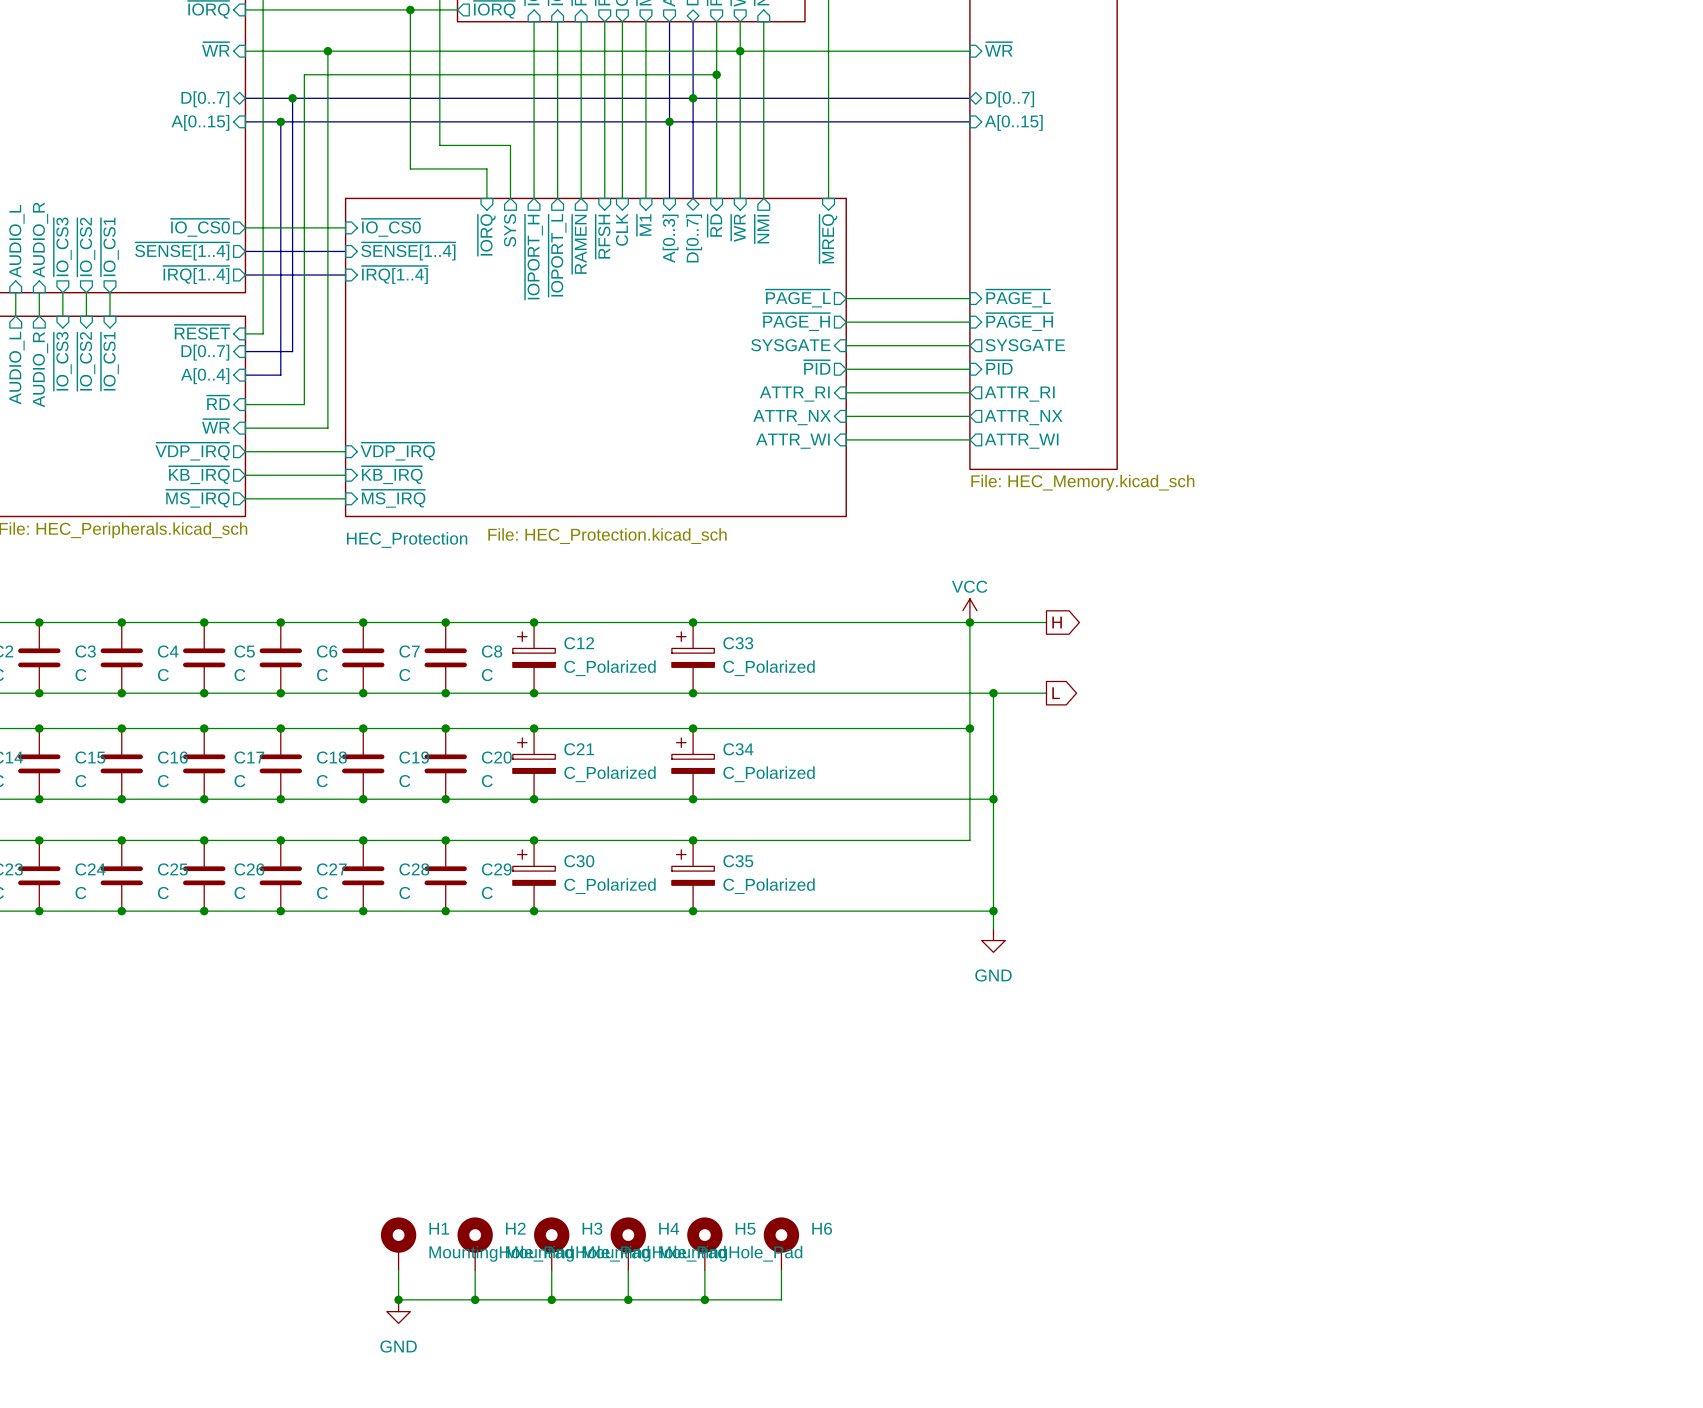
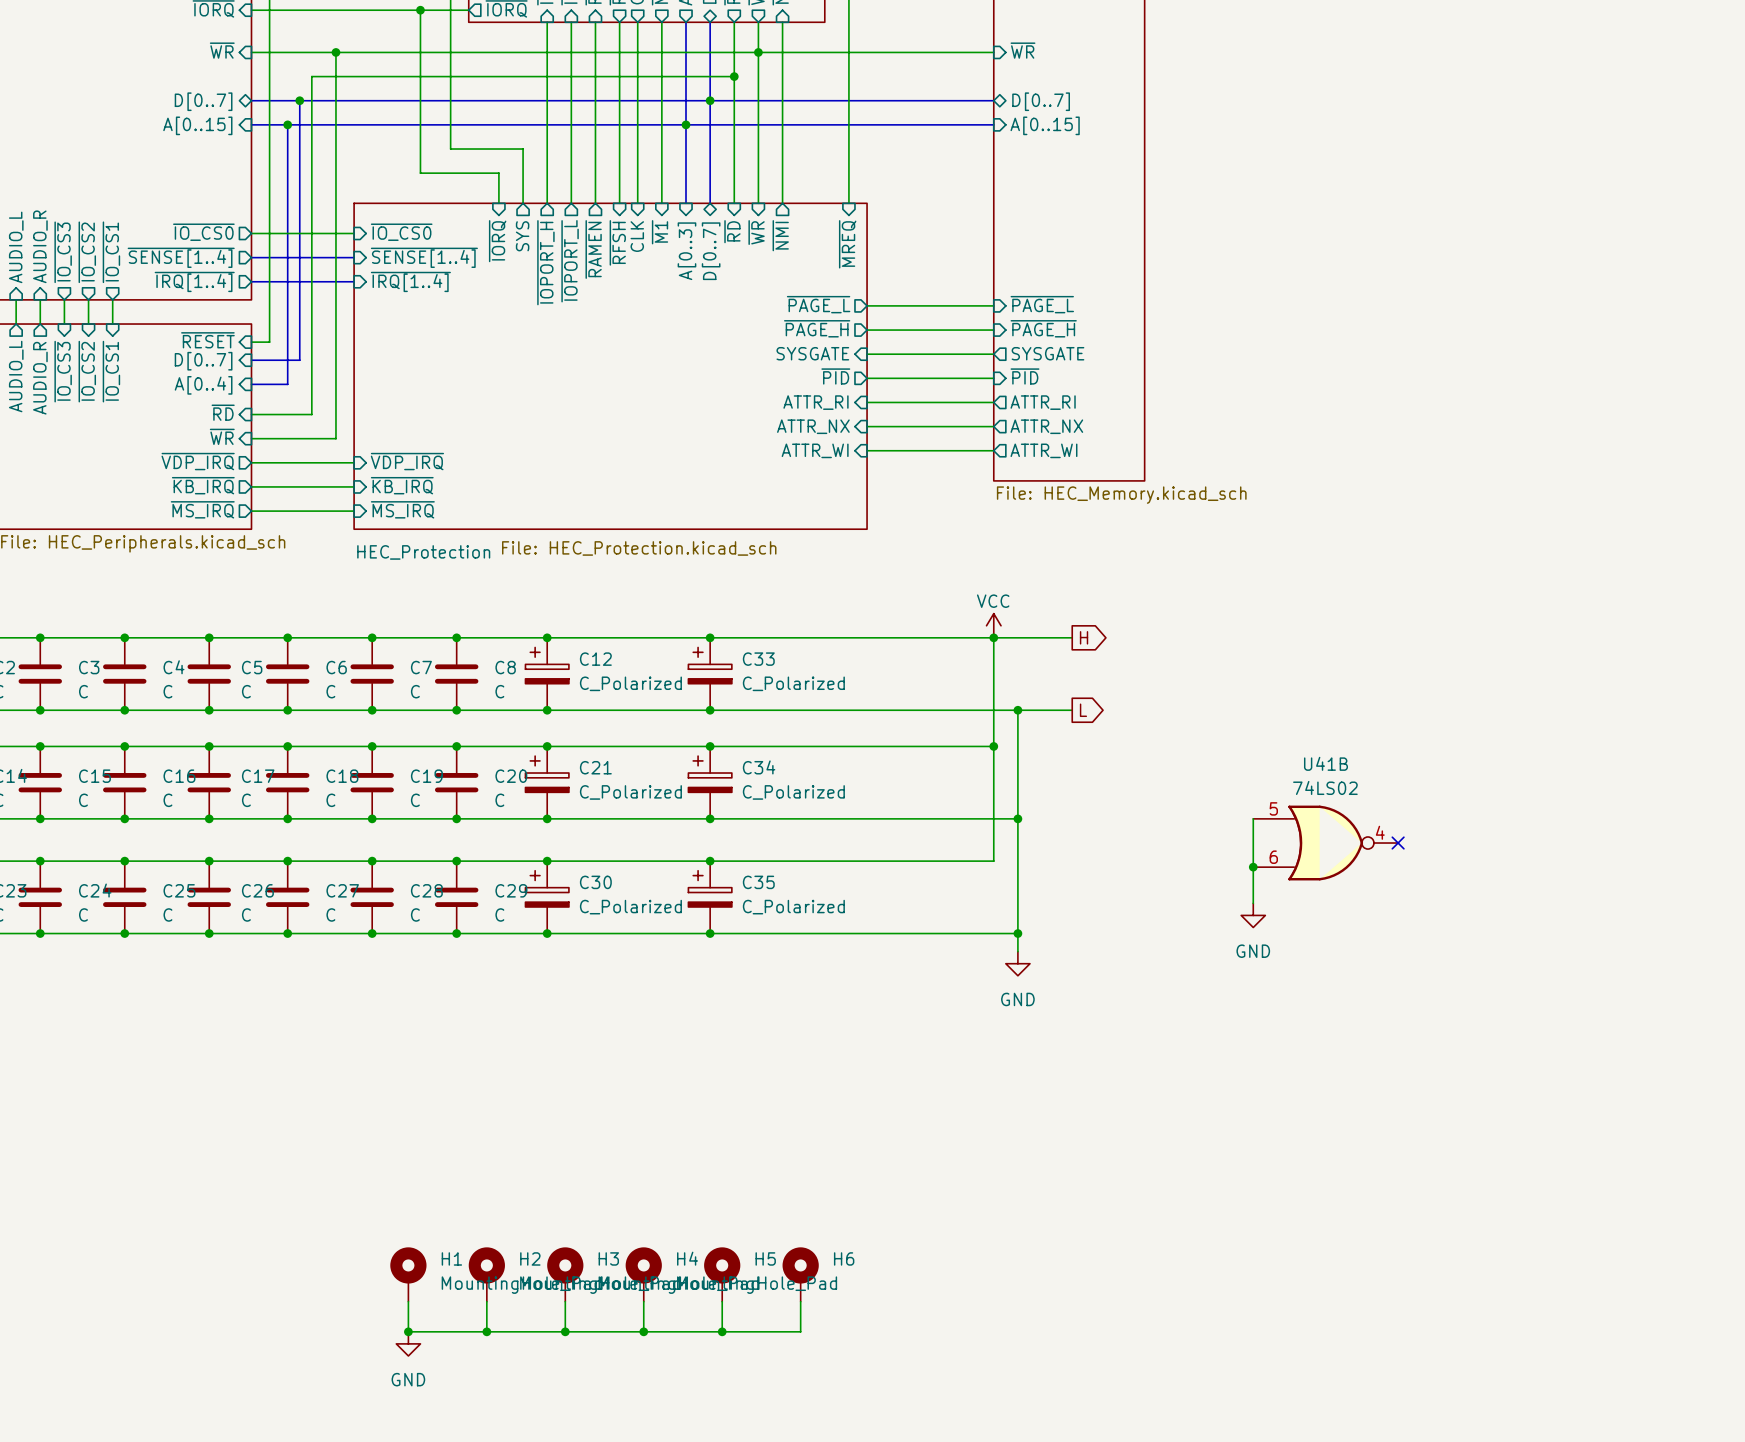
wire: none -> (1253, 818) (1253, 903)
U41B: none -> 74LS02 (1325, 843)
no-connect mark: none -> (1398, 843)
junction: none -> (1253, 867)
power symbol: none -> GND (1253, 915)

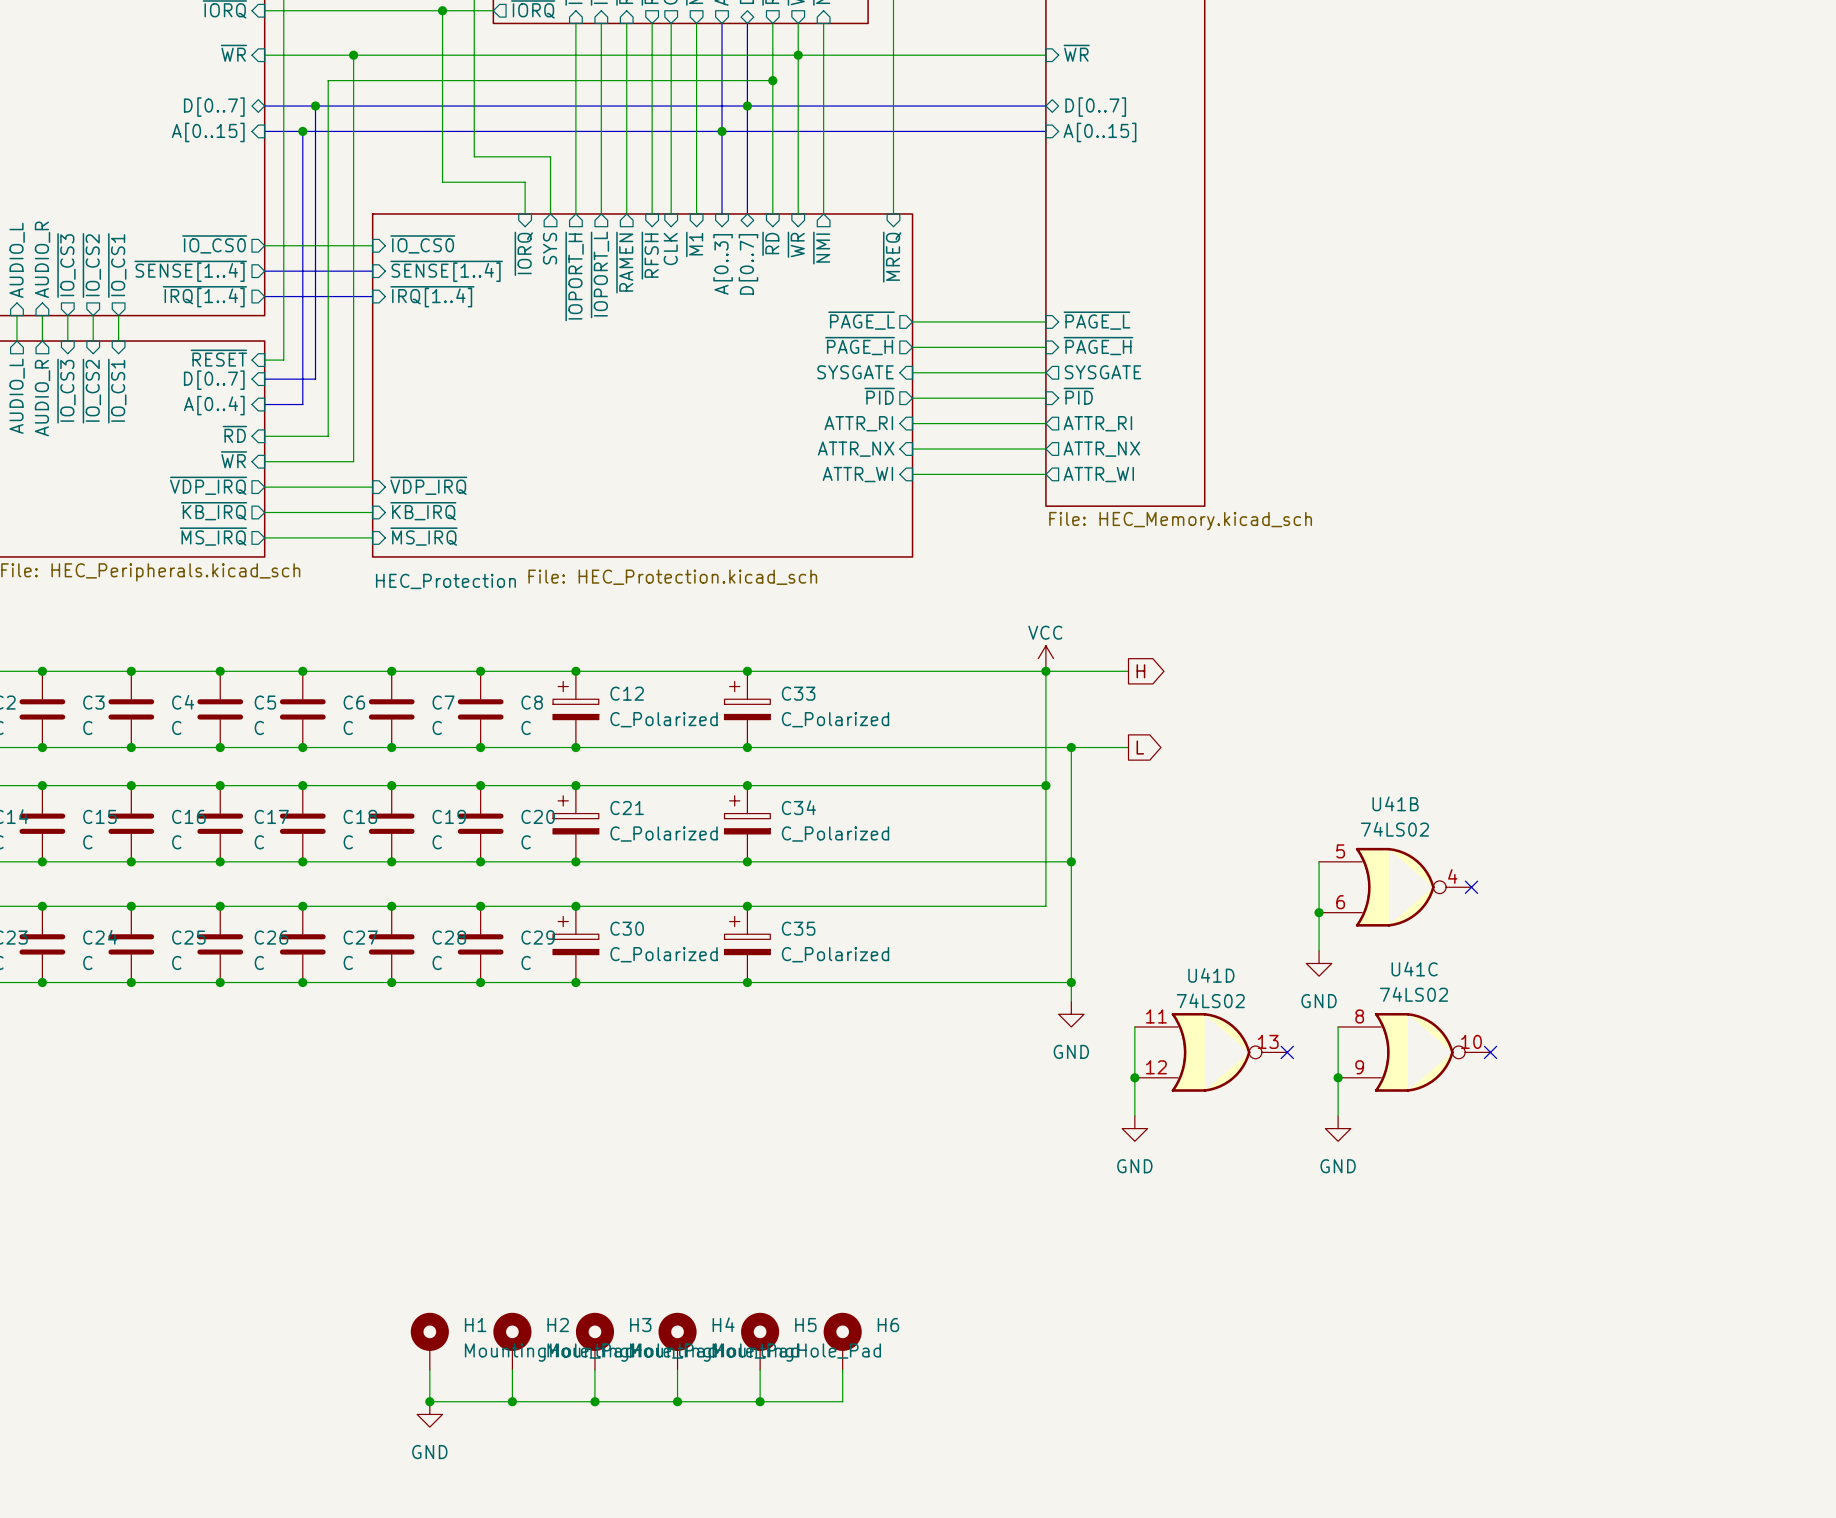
wire: none -> (1134, 1026) (1134, 1115)
wire: none -> (1338, 1026) (1338, 1115)
U41D: none -> 74LS02 (1211, 1052)
no-connect mark: none -> (1287, 1052)
U41C: none -> 74LS02 (1414, 1052)
no-connect mark: none -> (1490, 1052)
junction: none -> (1134, 1077)
junction: none -> (1338, 1077)
power symbol: none -> GND (1134, 1128)
power symbol: none -> GND (1338, 1128)

